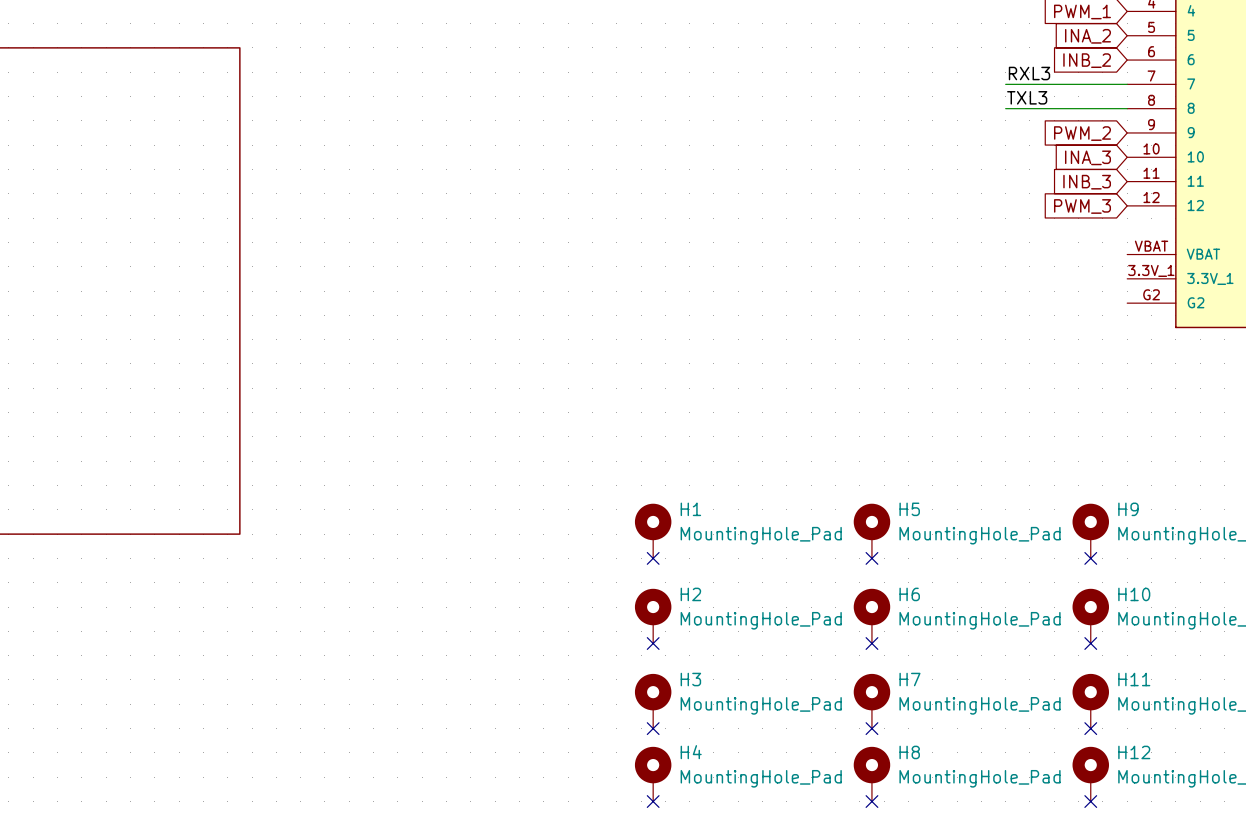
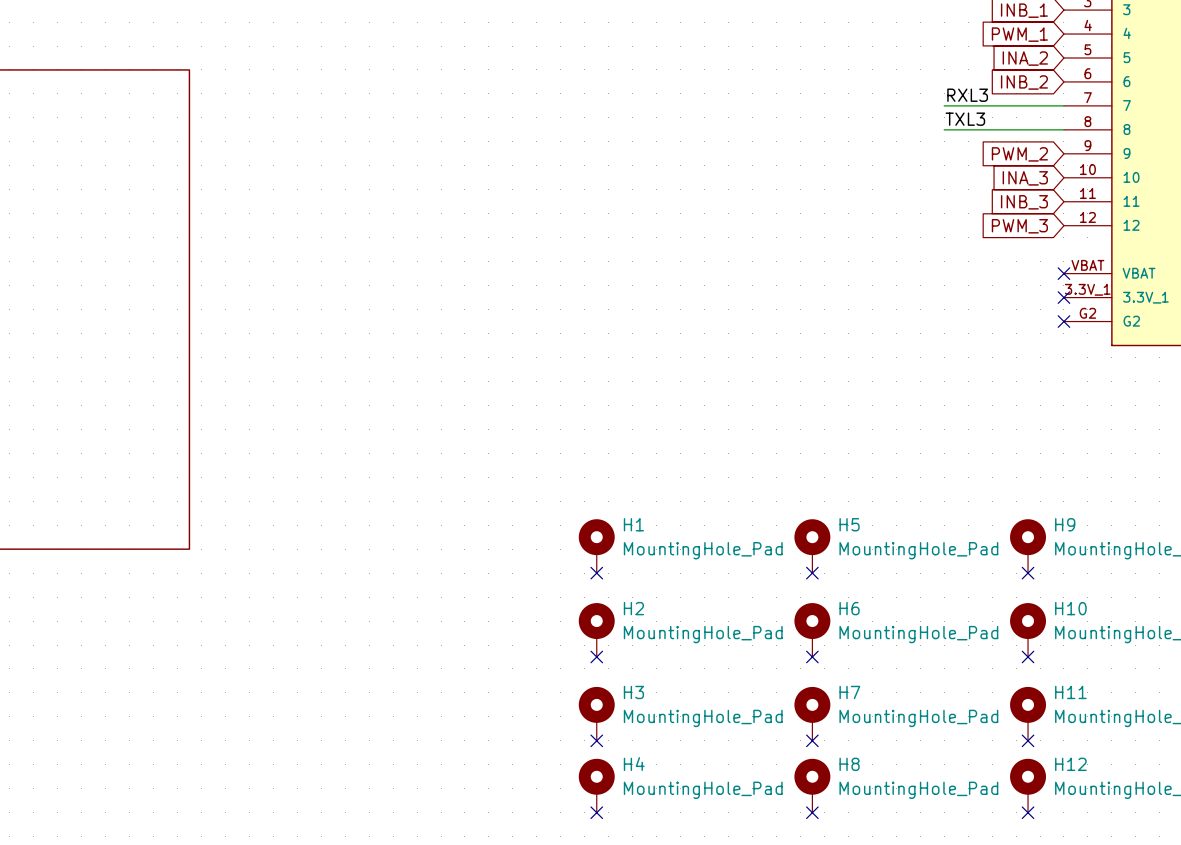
no-connect mark: none -> (1063, 273)
no-connect mark: none -> (1063, 297)
no-connect mark: none -> (1063, 321)

